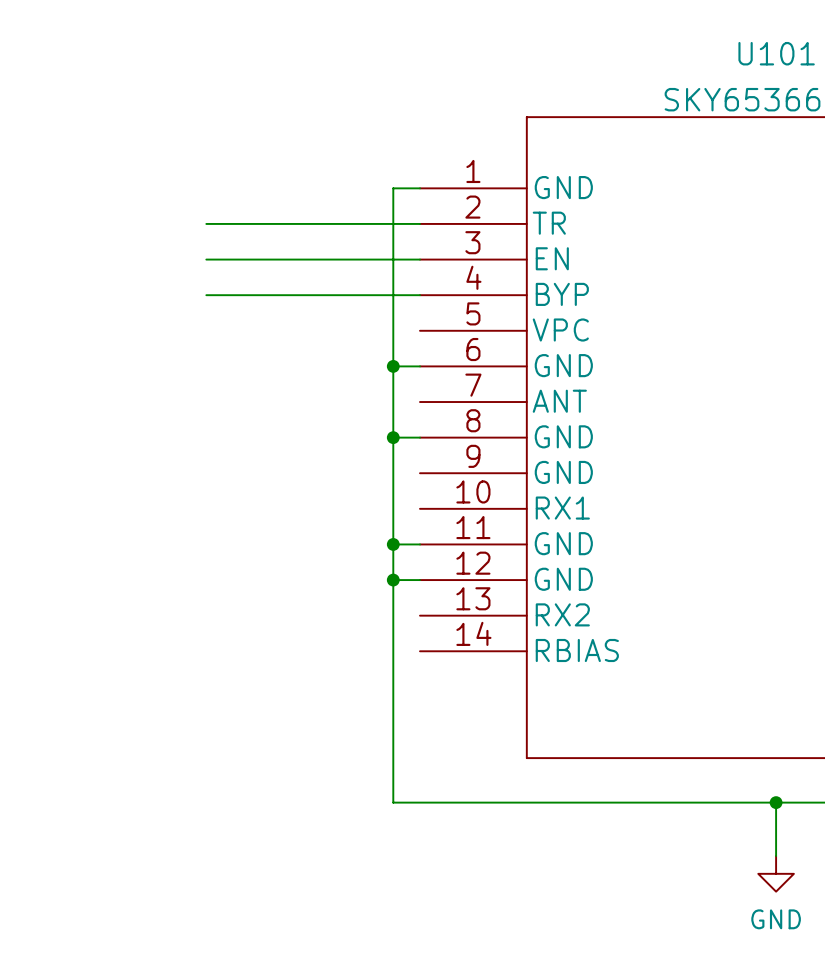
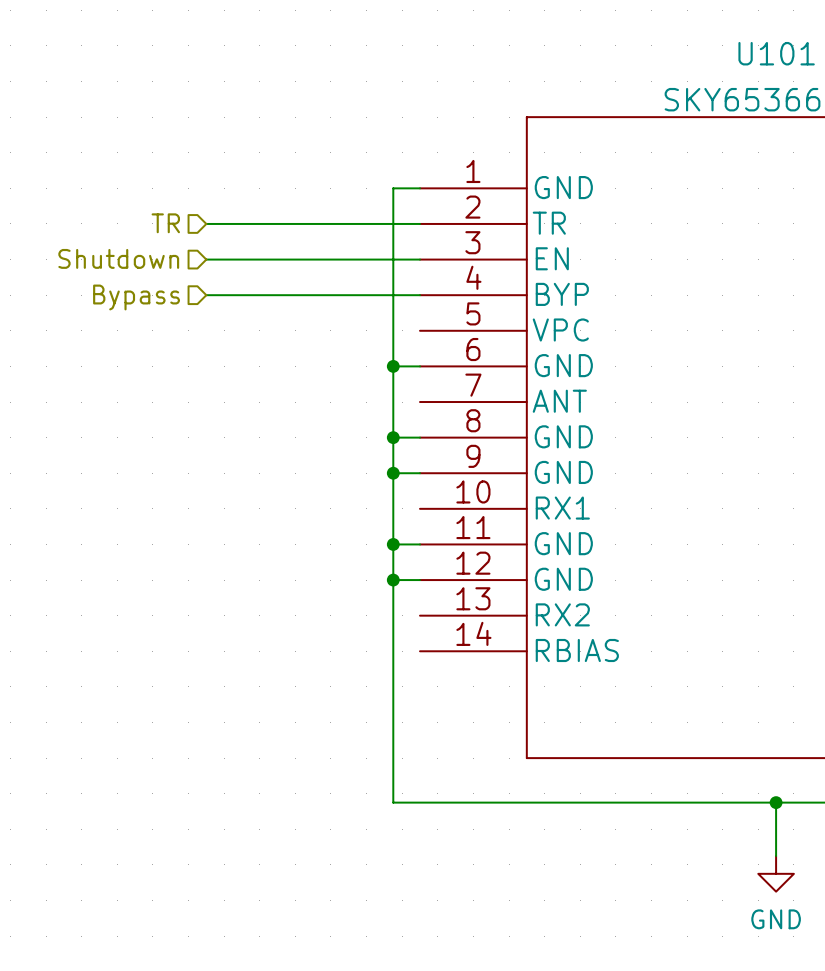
hierarchical label: none -> TR (165, 223)
hierarchical label: none -> Shutdown (118, 258)
hierarchical label: none -> Bypass (136, 297)
wire: none -> (393, 473) (420, 473)
junction: none -> (393, 473)

